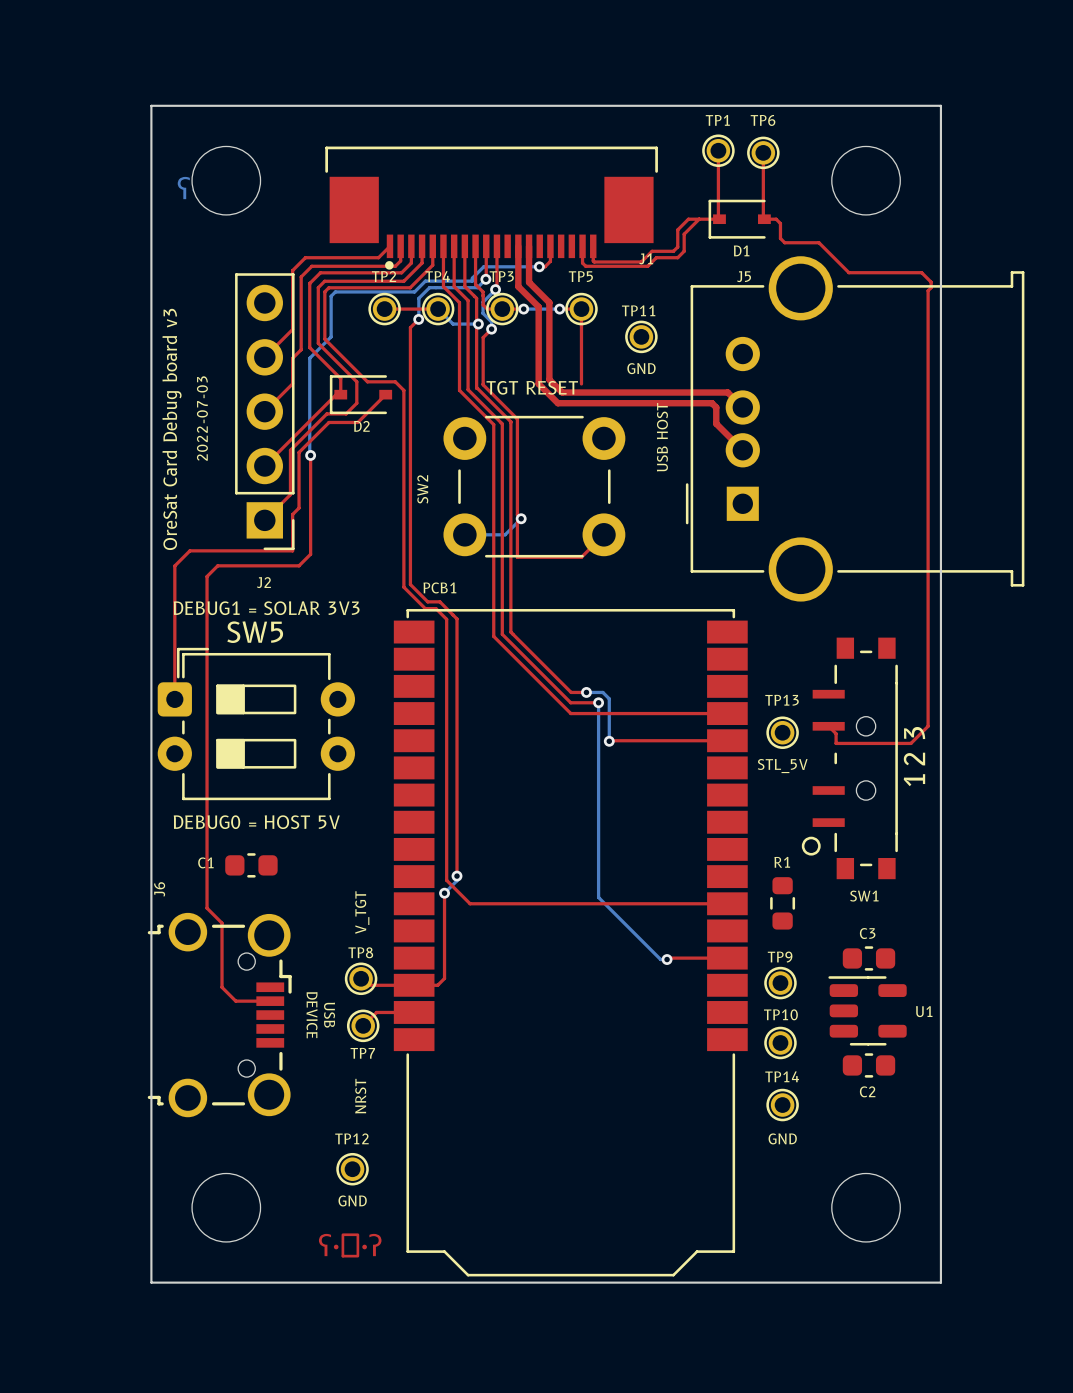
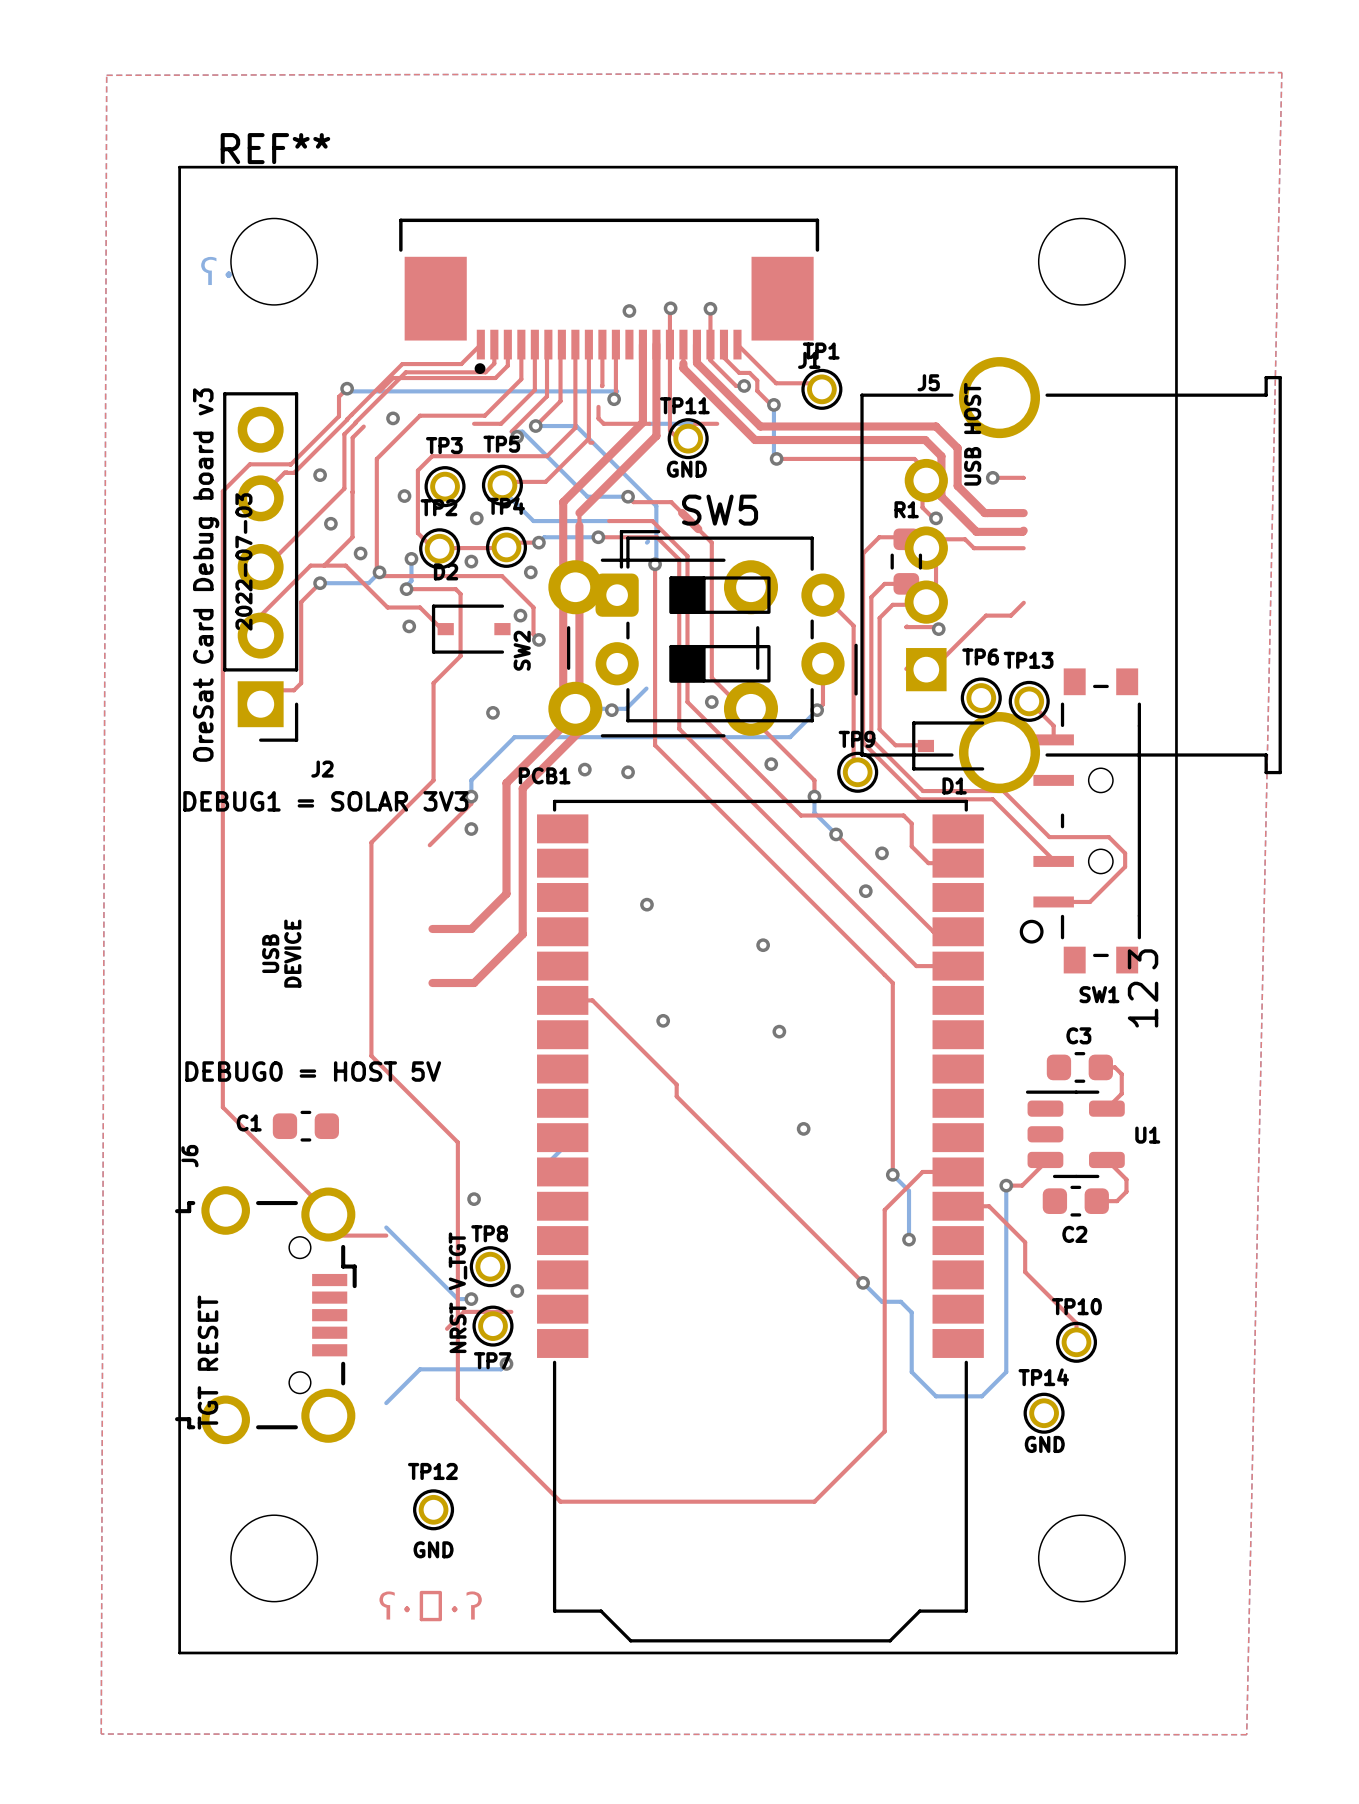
top zone outline: none -> (1281, 72) (106, 75) (101, 1734) (1246, 1734) (1281, 72)
REF** name: none -> REF** (275, 148)
top track: (718, 150) (719, 219) (688, 219) (677, 229) (677, 247) (673, 251) (652, 251) (641, 262) (594, 262) (593, 246) -> (825, 383) (776, 383) (737, 344)
TP1 position: (718, 150) -> (821, 389)
top track: (763, 152) (763, 218) (776, 219) (780, 223) (780, 238) (784, 242) (818, 242) (848, 272) (921, 272) (931, 282) (931, 287) (928, 290) (928, 726) (910, 743) (836, 743) (836, 733) (828, 726) -> none
TP6 position: (763, 152) -> (981, 698)
top track: none -> (669, 308) (669, 430) (687, 448)
via: none -> (670, 308)
top track: none -> (710, 308) (710, 360) (736, 385) (744, 385)
via: none -> (710, 308)
via: none -> (629, 311)
top track: (699, 219) (684, 234) (684, 251) (677, 257) (656, 257) (647, 266) (585, 266) (582, 263) (582, 256) -> (773, 404) (771, 404) (757, 390) (757, 380) (749, 372) (739, 372) (723, 357)
D1 position: (739, 219) -> (951, 745)
top track: (443, 246) (443, 286) (459, 302) (459, 390) (493, 424) (493, 636) (570, 713) (727, 713) -> (548, 344) (547, 396) (511, 431)
top track: (454, 246) (454, 286) (468, 300) (468, 379) -> (561, 344) (560, 401) (535, 426)
top track: none -> (696, 344) (696, 363) (760, 426) (936, 426) (957, 448) (957, 485) (984, 513) (1023, 513)
top track: (378, 257) (305, 257) (292, 270) (292, 329) (264, 357) -> (466, 358) (461, 364) (402, 364) (347, 419)
top track: (400, 260) (395, 266) (311, 266) (301, 276) (301, 349) (292, 358) (292, 383) (264, 411) -> (494, 363) (485, 372) (405, 372) (355, 422)
top track: (550, 261) (545, 266) (539, 266) -> (683, 363) (683, 368) (755, 440) (925, 440) (941, 456) (941, 496) (976, 531) (1023, 530)
top track: (422, 263) (403, 281) (324, 281) (318, 287) (318, 343) (356, 381) (356, 403) (346, 413) (326, 413) (290, 450) (290, 494) (264, 520) -> (521, 365) (521, 379) (484, 415) (420, 415) (376, 458) (376, 569) (383, 576) (502, 576) (533, 607) (533, 634) (538, 639)
top track: (432, 265) (410, 287) (328, 287) (324, 291) (324, 339) (367, 381) (395, 381) (403, 390) (403, 587) (425, 608) (435, 608) (446, 619) (446, 880) (470, 903) (727, 903) -> none
bottom track: (539, 266) (483, 266) (472, 278) (472, 281) (425, 281) (414, 291) (335, 291) (331, 296) (331, 336) (309, 358) (310, 455) -> none
via: (539, 266) -> none
bottom track: (485, 279) (477, 287) (429, 287) (418, 298) (418, 319) -> none
via: (485, 279) -> none
via: none -> (744, 385)
top track: none -> (347, 388) (339, 396) (339, 416) (290, 464)
bottom track: none -> (347, 388) (349, 391) (617, 391)
via: none -> (347, 388)
top track: (529, 282) (549, 302) (549, 379) -> (656, 390) (656, 435) (579, 512)
top track: (309, 283) (309, 347) (340, 378) (340, 394) (336, 394) (264, 466) -> none
top track: (475, 284) (483, 291) (483, 295) -> (588, 392) (588, 438) (545, 481) (503, 481) (499, 486) (506, 494)
top track: (464, 286) (476, 298) (476, 388) (510, 421) (510, 632) (571, 692) (586, 692) -> (575, 395) (575, 427) (547, 456) (432, 456) (417, 470) (417, 533) (427, 542) (438, 542) (444, 548) (501, 548) (506, 542) (538, 542)
top track: (518, 286) (538, 306) (538, 383) (557, 403) (711, 403) (716, 407) (716, 423) (742, 450) -> (642, 395) (642, 422) (563, 502) (563, 726) (506, 783) (506, 893) (471, 928) (432, 928)
bottom track: (495, 289) (483, 302) (483, 313) (491, 321) (491, 329) -> none
bottom track: none -> (773, 404) (773, 456) (776, 458)
via: none -> (773, 404)
via: none -> (393, 418)
top track: none -> (347, 419) (294, 472) (287, 472)
top track: none -> (355, 423) (344, 434) (344, 488) (266, 566) (260, 566)
TP2 position: (384, 309) -> (439, 548)
top track: (406, 309) (438, 309) -> (501, 423) (534, 390) (534, 368)
bottom track: (438, 309) (453, 324) (478, 324) -> none
TP4 position: (438, 309) -> (506, 547)
TP3 position: (502, 309) -> (445, 486)
via: (523, 309) -> none
via: (559, 309) -> none
top track: (581, 309) (581, 383) -> none
TP5 position: (581, 309) -> (502, 485)
bottom track: none -> (535, 426) (576, 426) (656, 506) (655, 564)
via: none -> (535, 426)
top track: none -> (363, 426) (352, 437) (352, 492)
bottom track: none -> (511, 431) (522, 431) (587, 496) (628, 496)
top track: (418, 319) (410, 327) (410, 584) (427, 601) (439, 601) (457, 618) (457, 876) -> none
via: (478, 324) -> none
top track: (491, 329) (483, 337) (483, 384) (517, 419) (517, 514) (521, 518) (517, 522) (517, 557) (581, 557) (603, 534) -> none
via: (491, 329) -> none
top track: none -> (776, 458) (914, 458) (922, 467) (922, 507) (933, 518) (936, 518)
via: none -> (776, 458)
TP11 position: (641, 336) -> (688, 438)
top track: none -> (290, 464) (249, 464) (222, 491) (222, 1107) (317, 1201) (317, 1220) (332, 1235) (386, 1235)
top track: none -> (286, 472) (272, 484) (272, 494)
via: none -> (320, 475)
top track: none -> (992, 477) (1023, 477)
via: none -> (992, 477)
top track: none -> (352, 492) (352, 537) (324, 565)
bottom track: none -> (506, 494) (533, 521) (609, 521)
via: none -> (404, 496)
top track: none -> (628, 496) (633, 502) (671, 502) (682, 512)
via: none -> (628, 496)
text position: GND (641, 368) -> GND (686, 469)
via: none -> (476, 518)
via: none -> (936, 518)
top track: none -> (609, 521) (652, 521) (687, 556) (687, 702) (800, 815) (903, 815) (911, 823) (911, 846) (928, 863) (958, 863)
text: TGT RESET (532, 387) -> none
via: none -> (330, 523)
top track: (468, 389) (502, 423) (502, 634) (570, 702) (598, 702) -> (579, 525) (579, 731) (522, 788) (522, 934) (474, 983) (432, 983)
top track: (562, 392) (727, 392) (742, 407) -> (698, 529) (711, 542) (711, 677) (814, 780) (814, 796)
D2 position: (360, 394) -> (471, 629)
top track: (385, 394) (357, 422) (328, 422) (299, 452) (299, 508) (292, 514) (292, 550) (189, 550) (174, 565) (174, 699) -> none
top track: none -> (598, 537) (656, 537) (679, 559) (679, 728) (916, 966) (958, 966)
bottom track: none -> (598, 537) (544, 537) (538, 542)
via: none -> (598, 537)
top track: none -> (906, 537) (879, 537) (863, 553) (863, 742) (919, 799) (992, 799) (1053, 861)
top track: none -> (906, 539) (965, 539) (973, 548) (1023, 548)
bottom track: none -> (648, 541) (646, 542)
via: none -> (538, 542)
J2 position: (264, 411) -> (260, 566)
via: none -> (360, 553)
top track: none -> (936, 553) (936, 596) (927, 604) (892, 604) (879, 617) (879, 729) (895, 745) (929, 745)
bottom track: none -> (411, 558) (411, 580) (406, 585) (406, 589)
via: none -> (411, 558)
via: none -> (471, 561)
top track: none -> (655, 564) (655, 745) (892, 983) (892, 1174)
via: none -> (655, 564)
bottom track: none -> (379, 572) (368, 583) (320, 583)
via: none -> (379, 572)
via: none -> (530, 572)
top track: none -> (320, 583) (301, 602) (301, 683) (294, 690) (274, 690)
via: none -> (320, 583)
top track: none -> (906, 583) (884, 583) (871, 597) (871, 739) (923, 791) (1003, 791) (1049, 837) (1108, 837) (1125, 853) (1125, 866) (1090, 901) (1053, 901)
text position: USB HOST (662, 437) -> USB HOST (972, 434)
top track: none -> (406, 589) (455, 589) (460, 593) (460, 656) (433, 683) (433, 780) (371, 842) (371, 1055) (457, 1142) (457, 1399) (560, 1501) (814, 1501) (884, 1431) (884, 1209) (922, 1171) (958, 1171)
via: none -> (406, 589)
top track: none -> (822, 595) (853, 625) (853, 768) (857, 772)
top track: none -> (1023, 602) (1011, 615) (986, 615) (939, 662) (913, 662) (906, 668)
top track: (310, 455) (310, 554) (299, 565) (217, 565) (207, 576) (207, 908) (222, 923) (222, 987) (235, 1001) (270, 1001) -> none
via: (310, 455) -> none
via: none -> (520, 615)
via: none -> (409, 626)
top track: none -> (906, 626) (936, 627) (938, 629)
via: none -> (938, 629)
top track: none -> (445, 630) (441, 629) (420, 607) (387, 607) (345, 565) (310, 565) (260, 615) (260, 635)
via: none -> (538, 639)
top track: none -> (822, 663) (822, 704) (817, 710)
via: (521, 518) -> none
top track: none -> (1029, 701) (1053, 725) (1053, 739)
via: none -> (711, 702)
via: none -> (611, 710)
bottom track: none -> (817, 710) (790, 737) (514, 737) (471, 780) (471, 796)
via: none -> (817, 710)
via: none -> (492, 712)
via: none -> (771, 764)
via: none -> (584, 769)
via: none -> (628, 772)
top track: none -> (471, 796) (471, 803) (429, 845)
via: none -> (471, 796)
bottom track: none -> (814, 796) (814, 812) (836, 834)
via: none -> (814, 796)
via: none -> (471, 829)
top track: none -> (836, 834) (933, 931) (958, 931)
via: none -> (836, 834)
via: none -> (882, 853)
via: none -> (865, 891)
via: none -> (646, 904)
bottom track: (586, 692) (602, 692) (609, 698) (609, 741) -> none
via: (586, 692) -> none
bottom track: (598, 702) (598, 897) (660, 959) (667, 959) -> none
via: (598, 702) -> none
via: none -> (763, 945)
SW5 position: (256, 724) -> (720, 626)
TP13 position: (782, 732) -> (1029, 701)
top track: (727, 740) (609, 741) -> none
via: (609, 741) -> none
SW1 position: (849, 758) -> (1080, 820)
top track: none -> (562, 1000) (592, 1000) (676, 1084) (676, 1096) (863, 1282)
text: STL_5V (782, 766) -> none
via: none -> (663, 1020)
via: none -> (779, 1031)
top track: none -> (1100, 1067) (1115, 1067) (1121, 1074) (1121, 1093) (1106, 1108)
via: none -> (803, 1128)
via: (457, 876) -> none
top track: none -> (1048, 1159) (1022, 1185) (1006, 1185)
top track: none -> (1106, 1159) (1126, 1179) (1126, 1191) (1117, 1201) (1096, 1201)
top track: (444, 893) (444, 978) (437, 985) (367, 985) (361, 978) -> none
via: (444, 893) -> none
bottom track: none -> (892, 1174) (909, 1191) (909, 1239)
via: none -> (892, 1174)
R1 position: (782, 903) -> (906, 561)
text position: V_TGT (362, 912) -> V_TGT (458, 1261)
bottom track: none -> (1006, 1185) (1006, 1372) (981, 1396) (936, 1396) (911, 1372) (911, 1312) (900, 1301) (882, 1301) (863, 1282)
via: none -> (1006, 1185)
via: none -> (474, 1199)
top track: none -> (958, 1206) (989, 1206) (1025, 1242) (1025, 1272) (1076, 1323) (1076, 1342)
PCB1 position: (570, 942) -> (760, 1221)
bottom track: none -> (386, 1227) (457, 1299) (471, 1299)
via: none -> (909, 1239)
top track: (727, 958) (667, 959) -> none
C3 position: (868, 958) -> (1079, 1067)
via: (667, 959) -> none
TP8 position: (361, 978) -> (490, 1266)
TP9 position: (780, 983) -> (857, 772)
via: none -> (863, 1282)
via: none -> (517, 1290)
via: none -> (471, 1299)
U1 position: (867, 1010) -> (1075, 1134)
text rotation: 0° (312, 1015) -> 180° (292, 953)
text position: DEVICE (312, 1015) -> DEVICE (292, 953)
text rotation: 0° (329, 1015) -> 180° (270, 953)
text position: USB (329, 1015) -> USB (270, 953)
TP7 position: (363, 1025) -> (492, 1326)
TP10 position: (780, 1042) -> (1076, 1342)
text: none -> TGT RESET (208, 1362)
bottom track: none -> (506, 1363) (501, 1369) (420, 1369) (386, 1403)
via: none -> (506, 1363)
C2 position: (868, 1065) -> (1075, 1201)
text position: NRST (360, 1096) -> NRST (458, 1327)
TP14 position: (782, 1105) -> (1044, 1413)
text position: GND (782, 1138) -> GND (1044, 1444)

